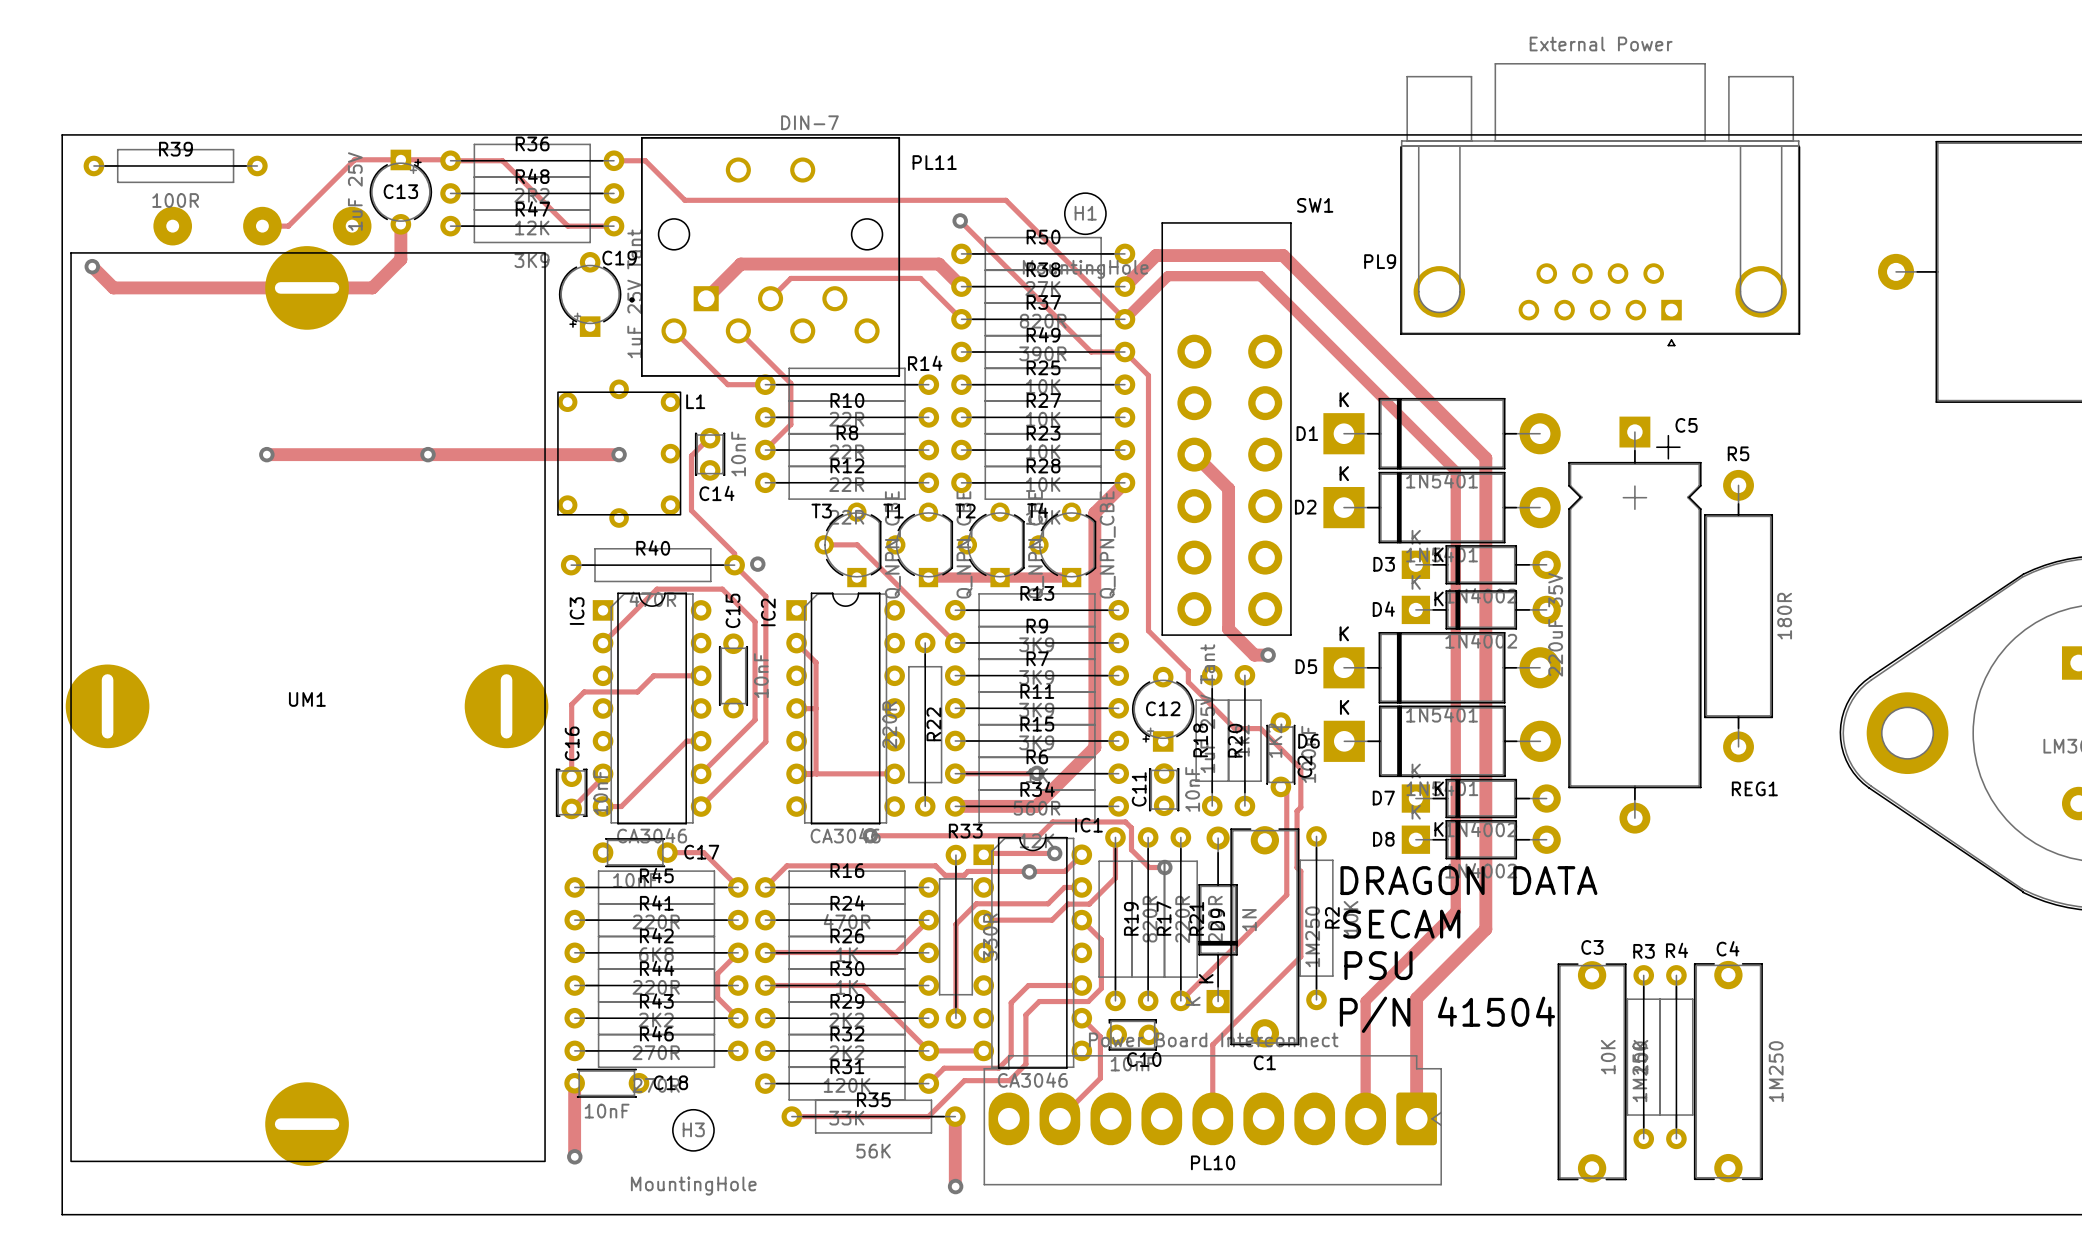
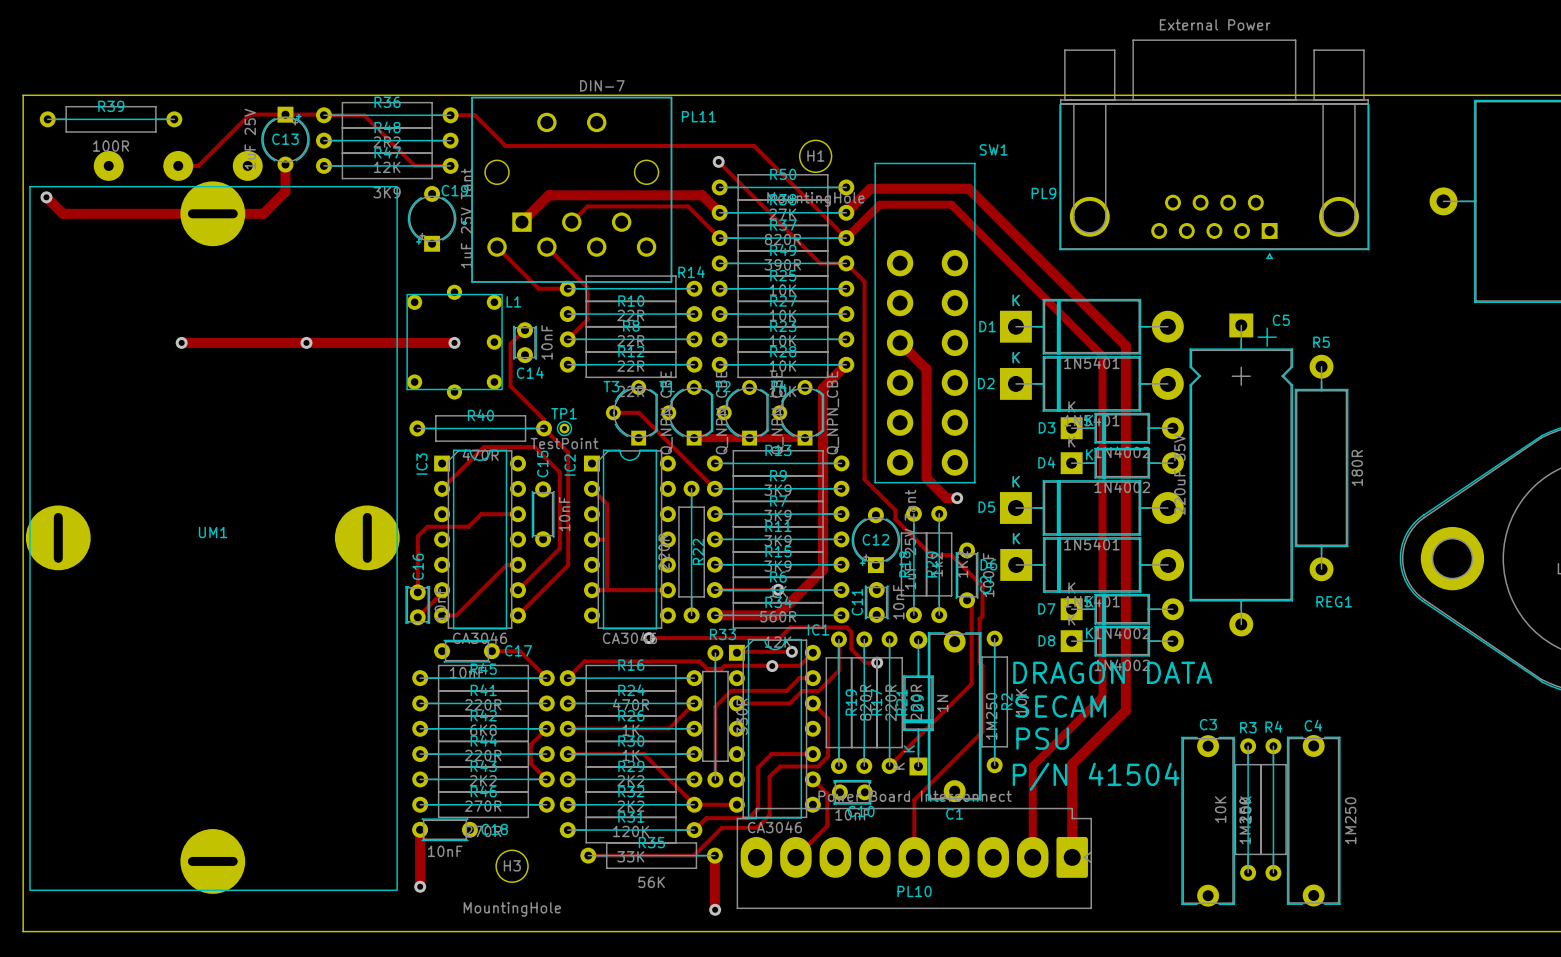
via: (757, 564) -> none
TP1: none -> TestPoint (564, 428)

